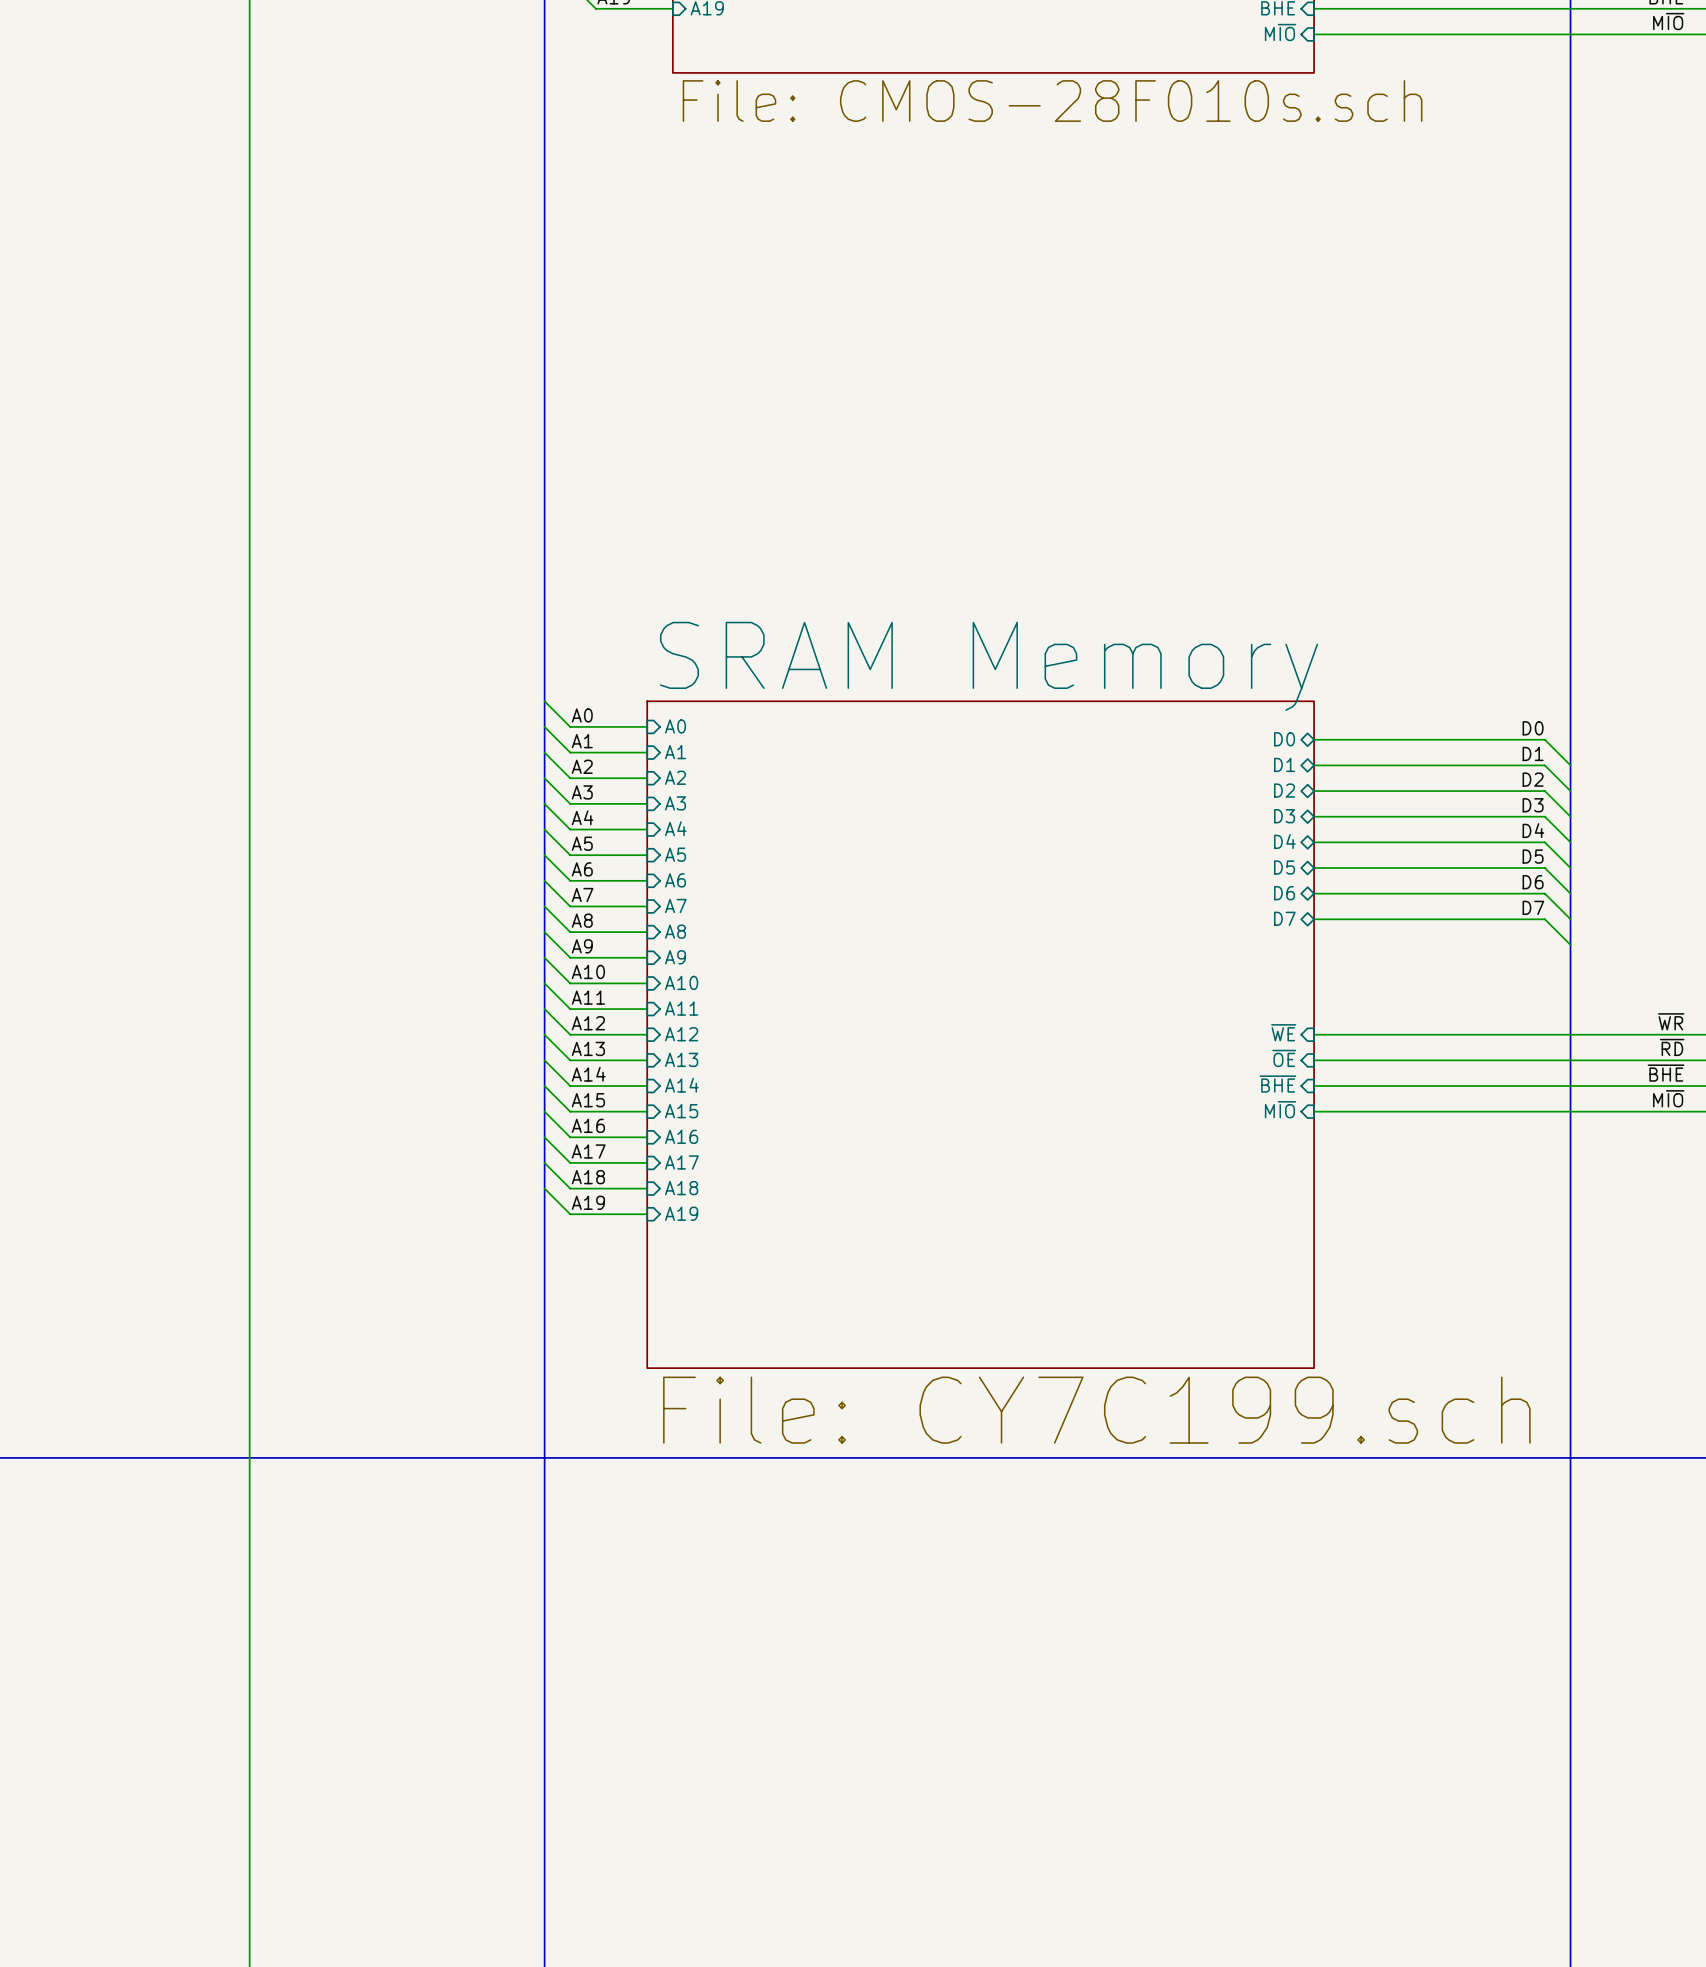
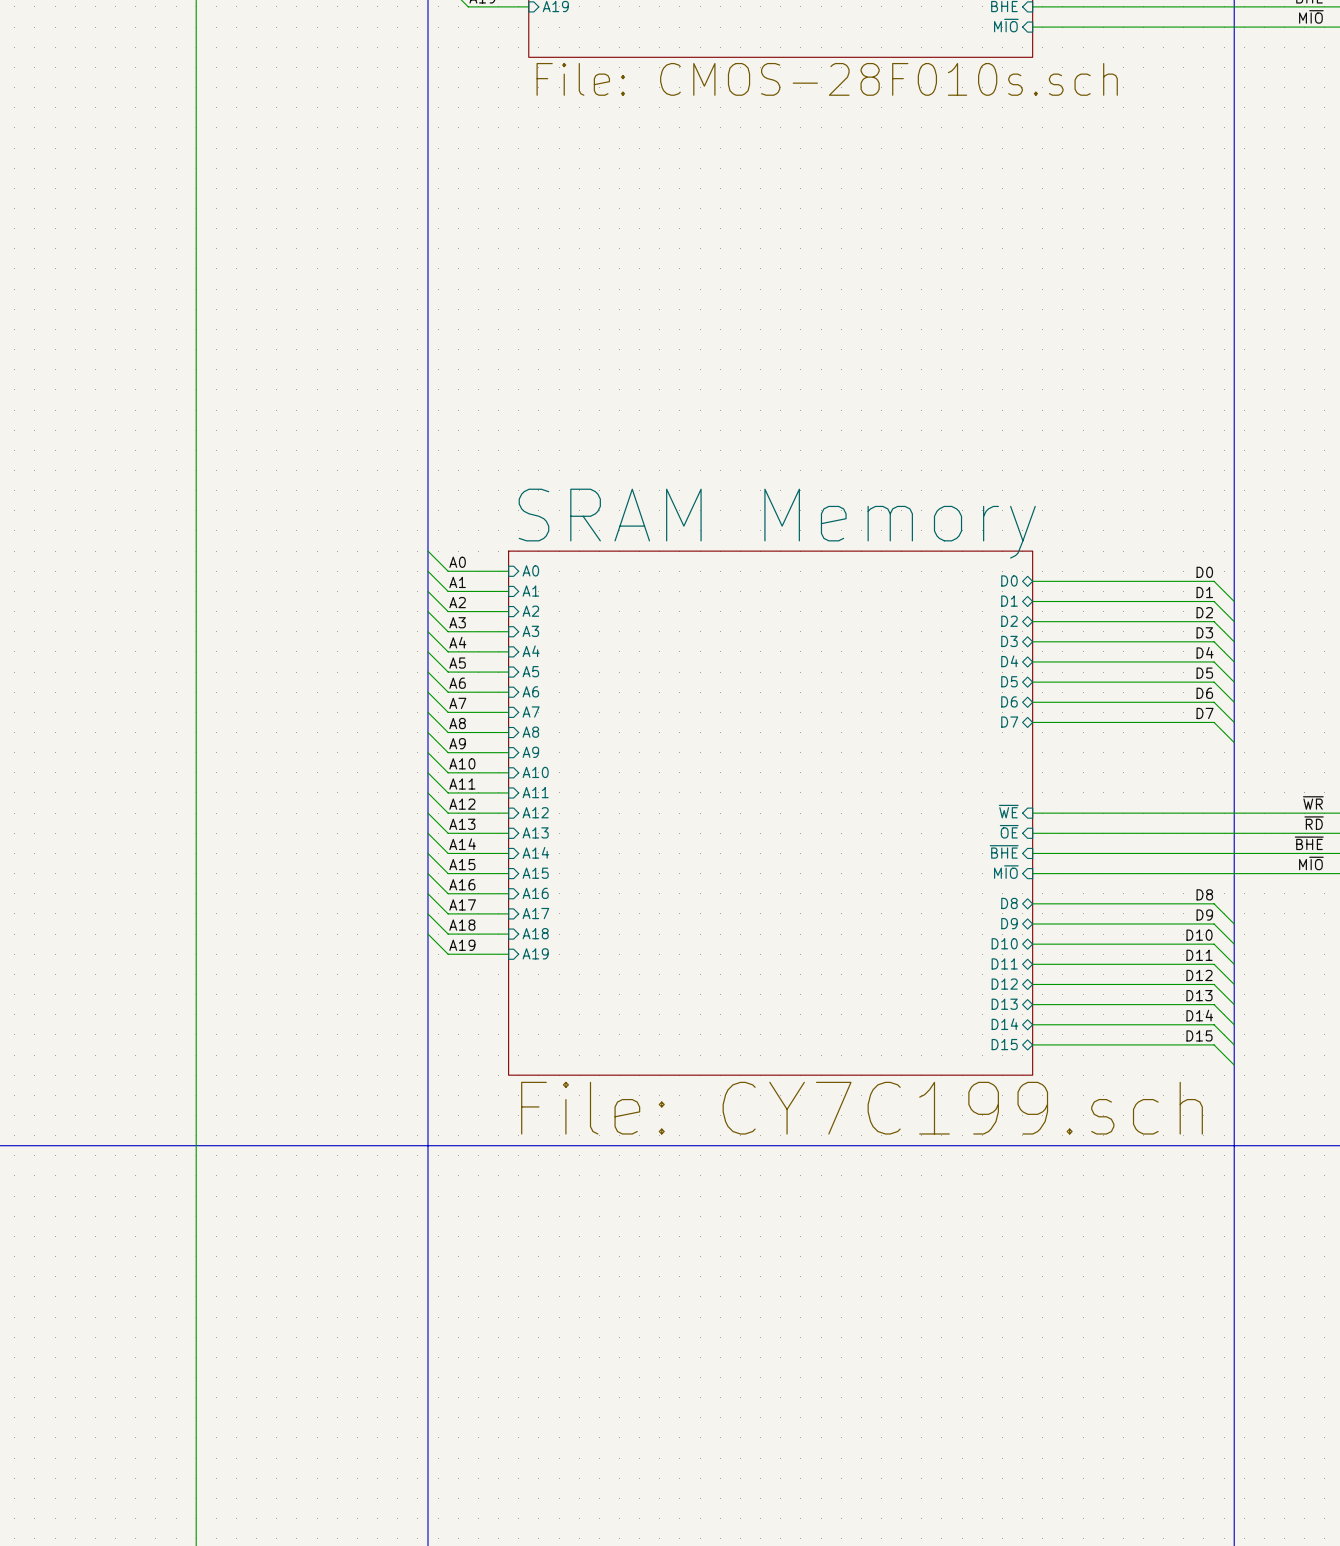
label: none -> D8 (1204, 894)
sheet pin: none -> D8 (1009, 903)
wire: none -> (1032, 903) (1214, 903) (1234, 923)
label: none -> D9 (1204, 915)
sheet pin: none -> D9 (1009, 923)
wire: none -> (1032, 923) (1214, 923) (1234, 944)
label: none -> D10 (1199, 935)
sheet pin: none -> D10 (1004, 943)
wire: none -> (1032, 944) (1214, 944) (1234, 964)
label: none -> D11 (1199, 955)
sheet pin: none -> D11 (1004, 963)
wire: none -> (1032, 964) (1214, 964) (1234, 984)
label: none -> D12 (1199, 975)
sheet pin: none -> D12 (1004, 984)
wire: none -> (1032, 984) (1214, 984) (1234, 1004)
label: none -> D13 (1199, 995)
sheet pin: none -> D13 (1004, 1004)
wire: none -> (1032, 1004) (1214, 1004) (1234, 1024)
label: none -> D14 (1199, 1015)
sheet pin: none -> D14 (1004, 1024)
wire: none -> (1032, 1024) (1214, 1024) (1234, 1044)
label: none -> D15 (1199, 1035)
sheet pin: none -> D15 (1004, 1044)
wire: none -> (1032, 1044) (1214, 1044) (1234, 1065)

